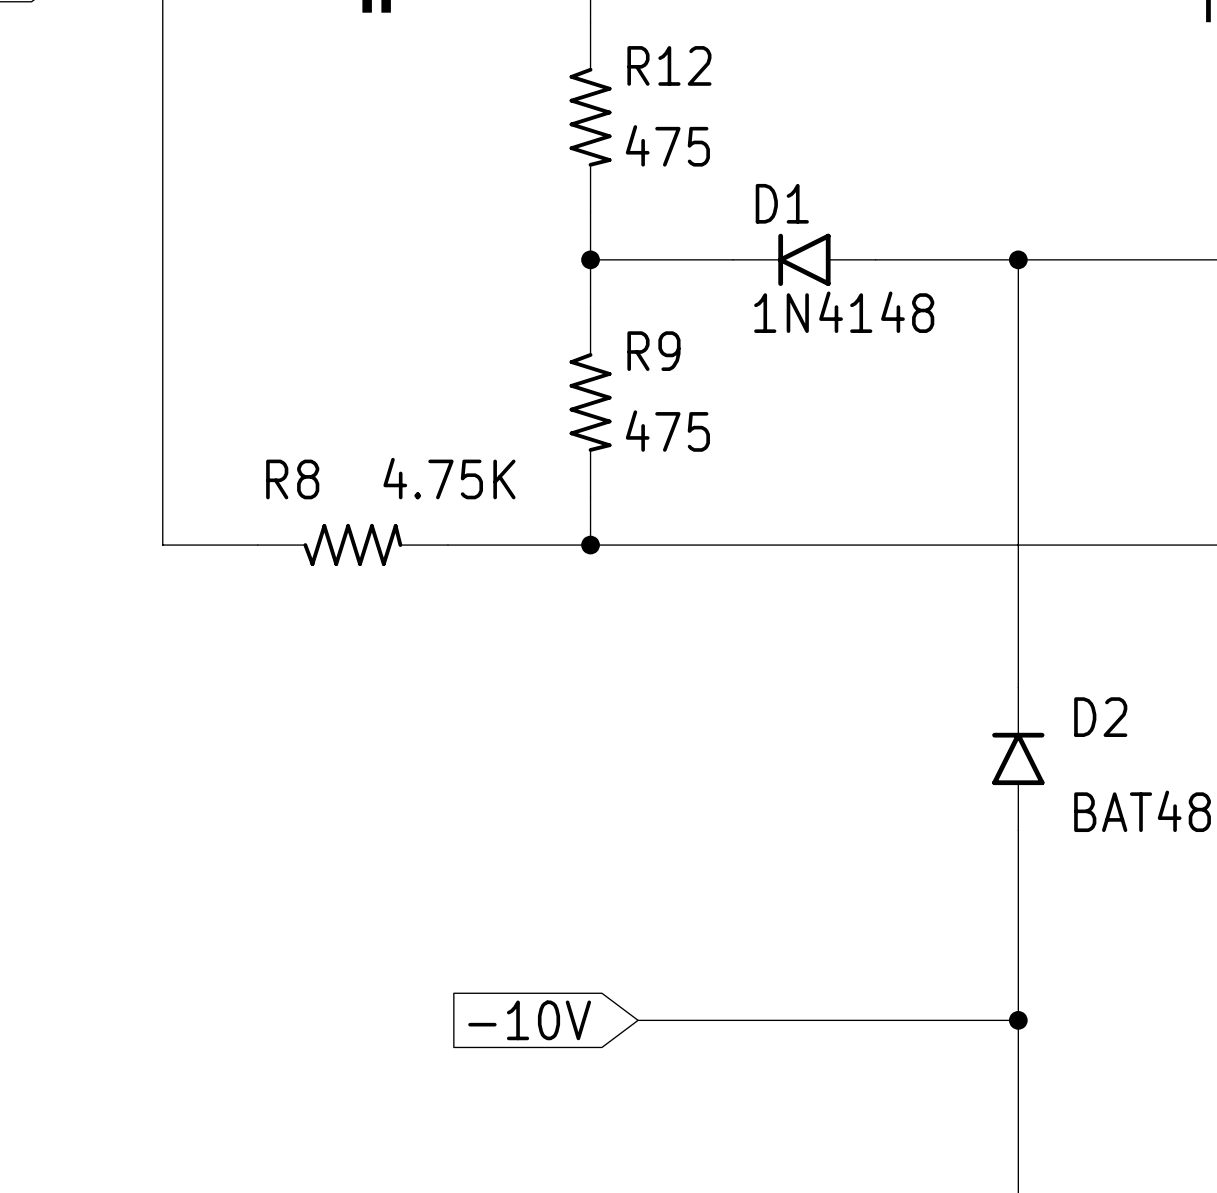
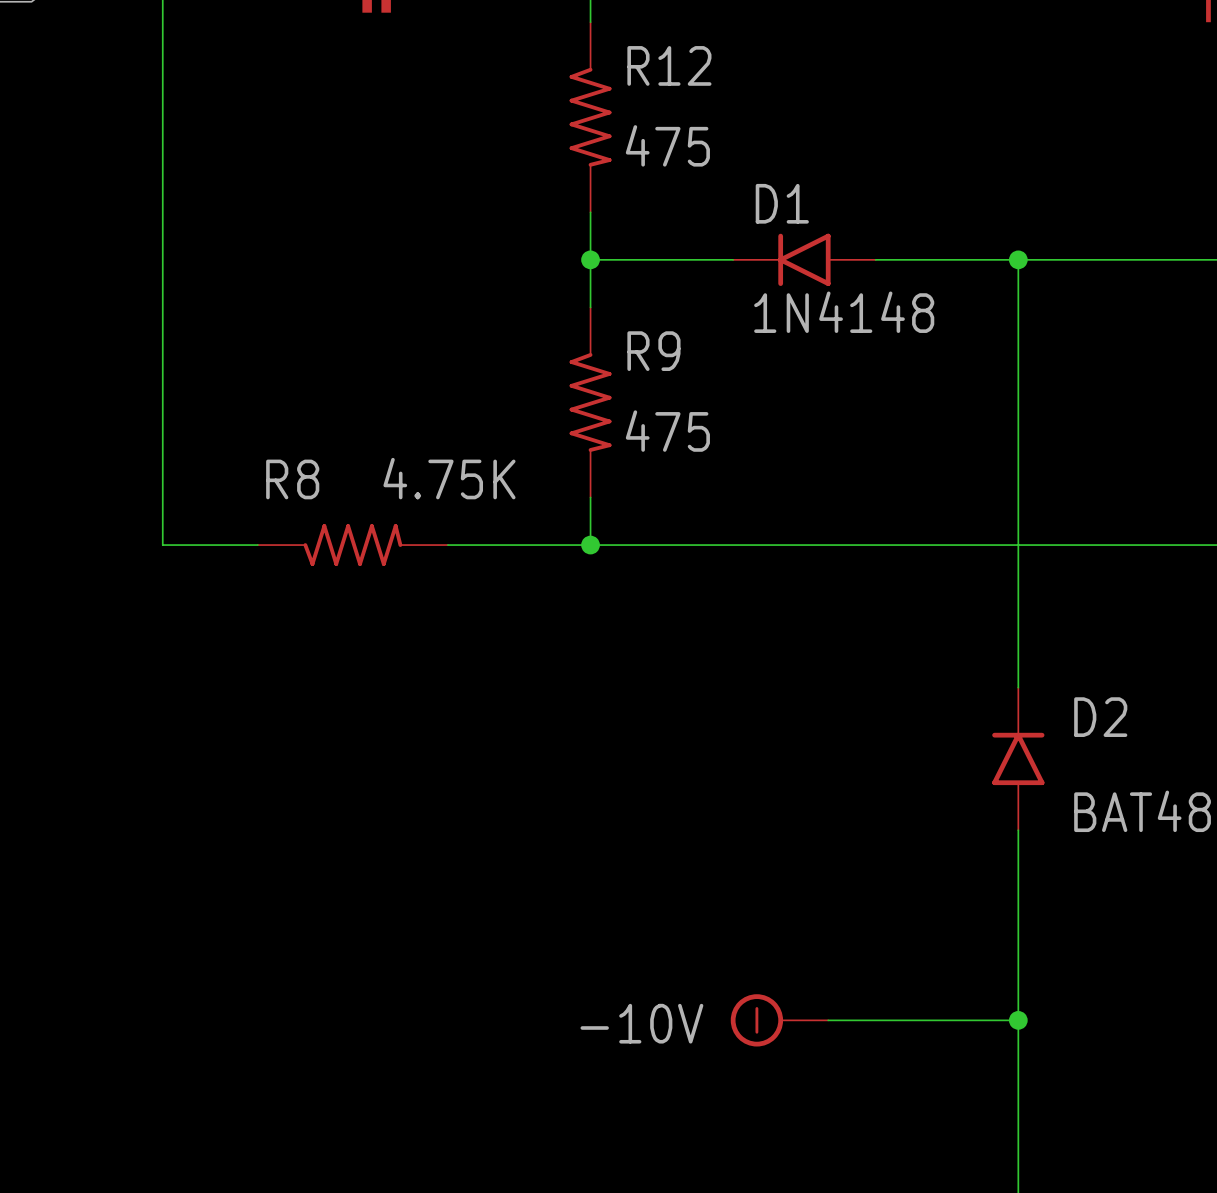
global label: -10V (529, 1020) -> none
wire: (638, 1020) (828, 1020) -> none
power symbol: none -> -10V (779, 1020)

